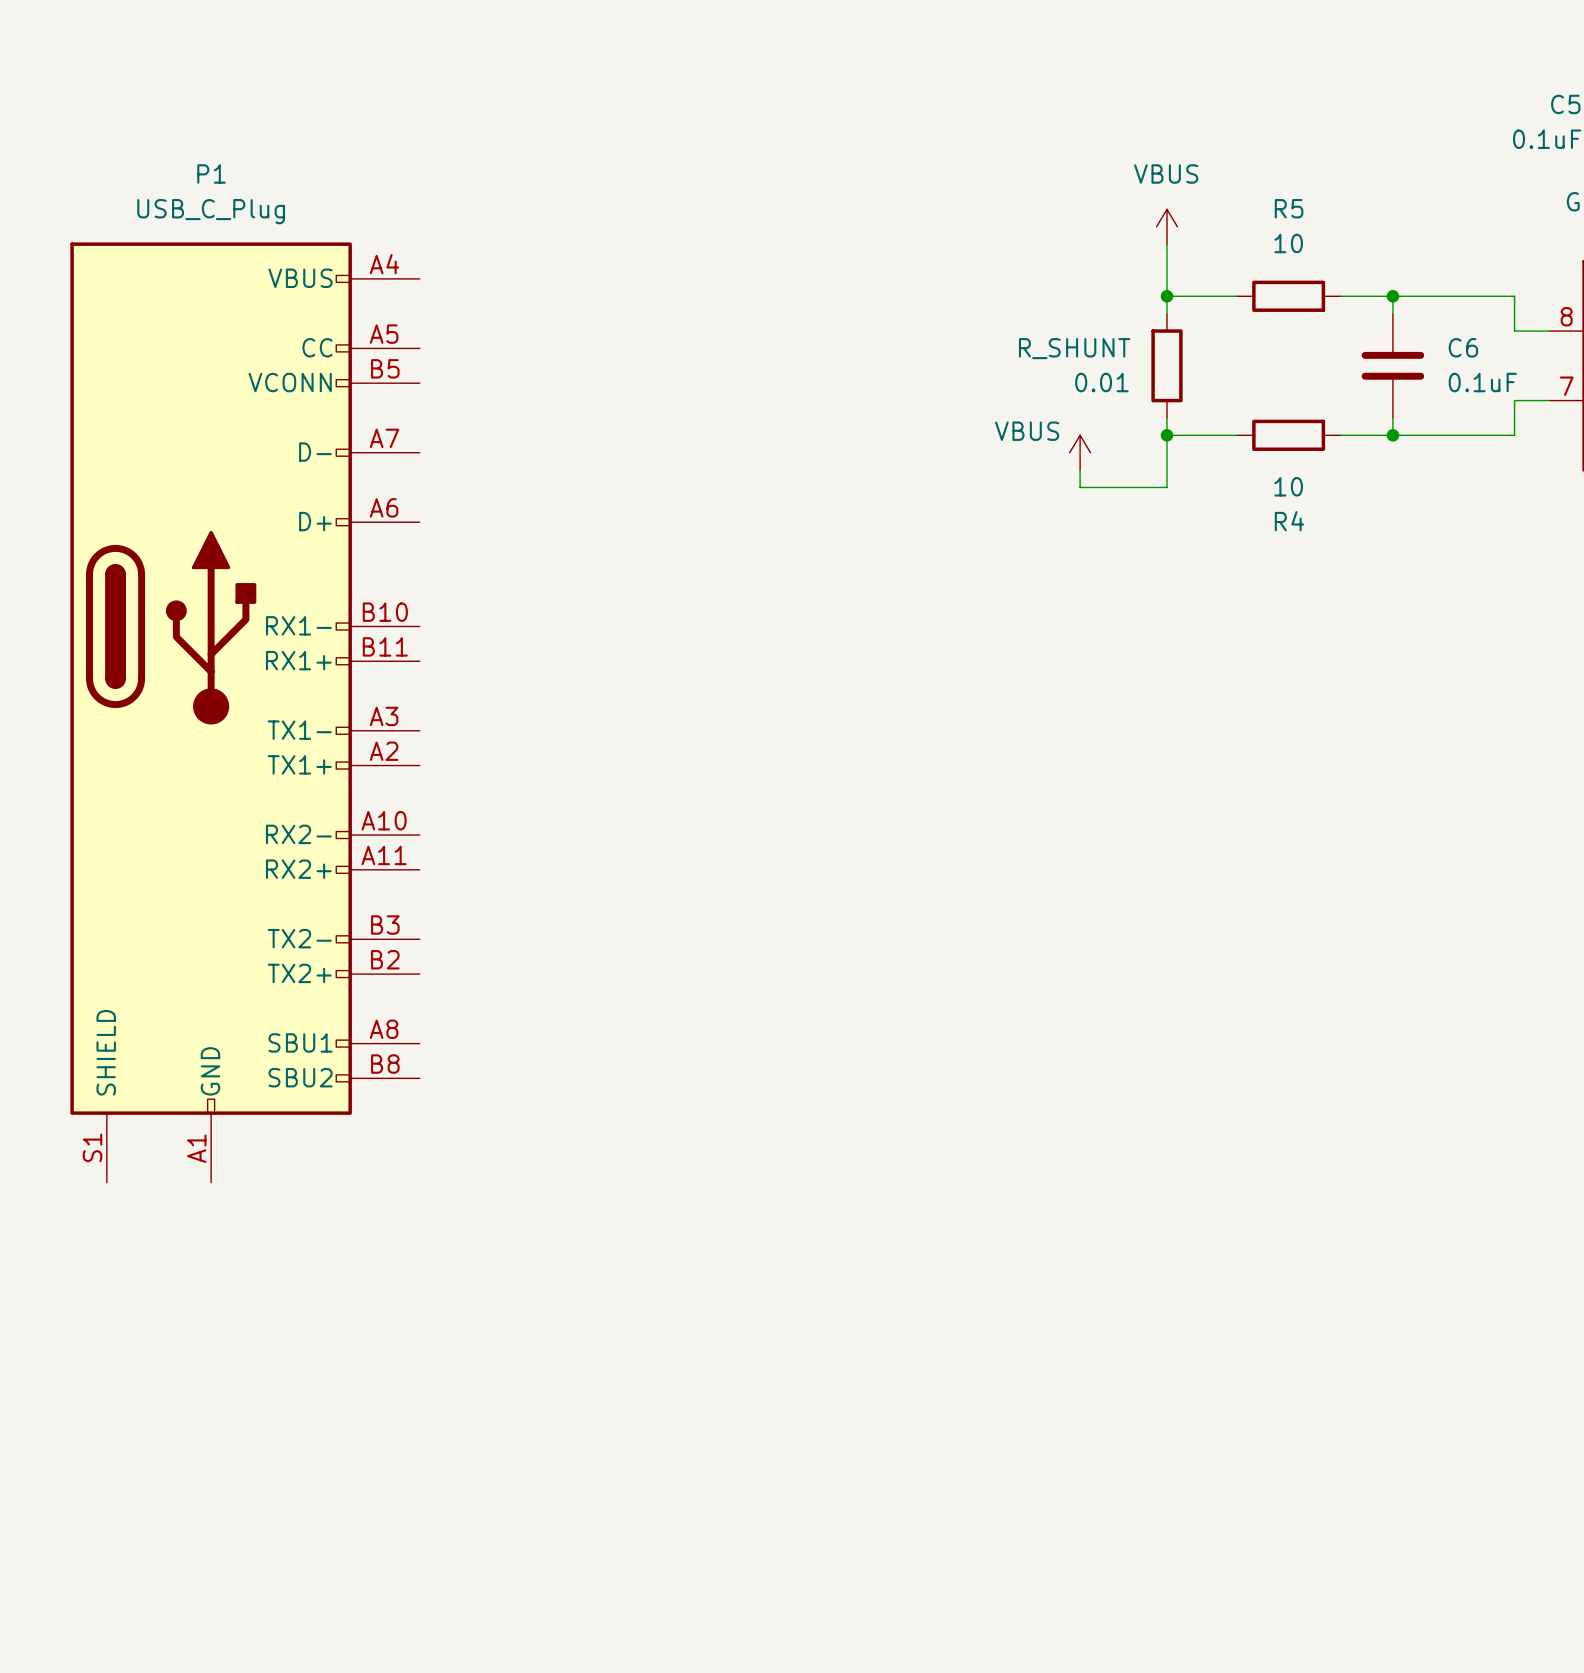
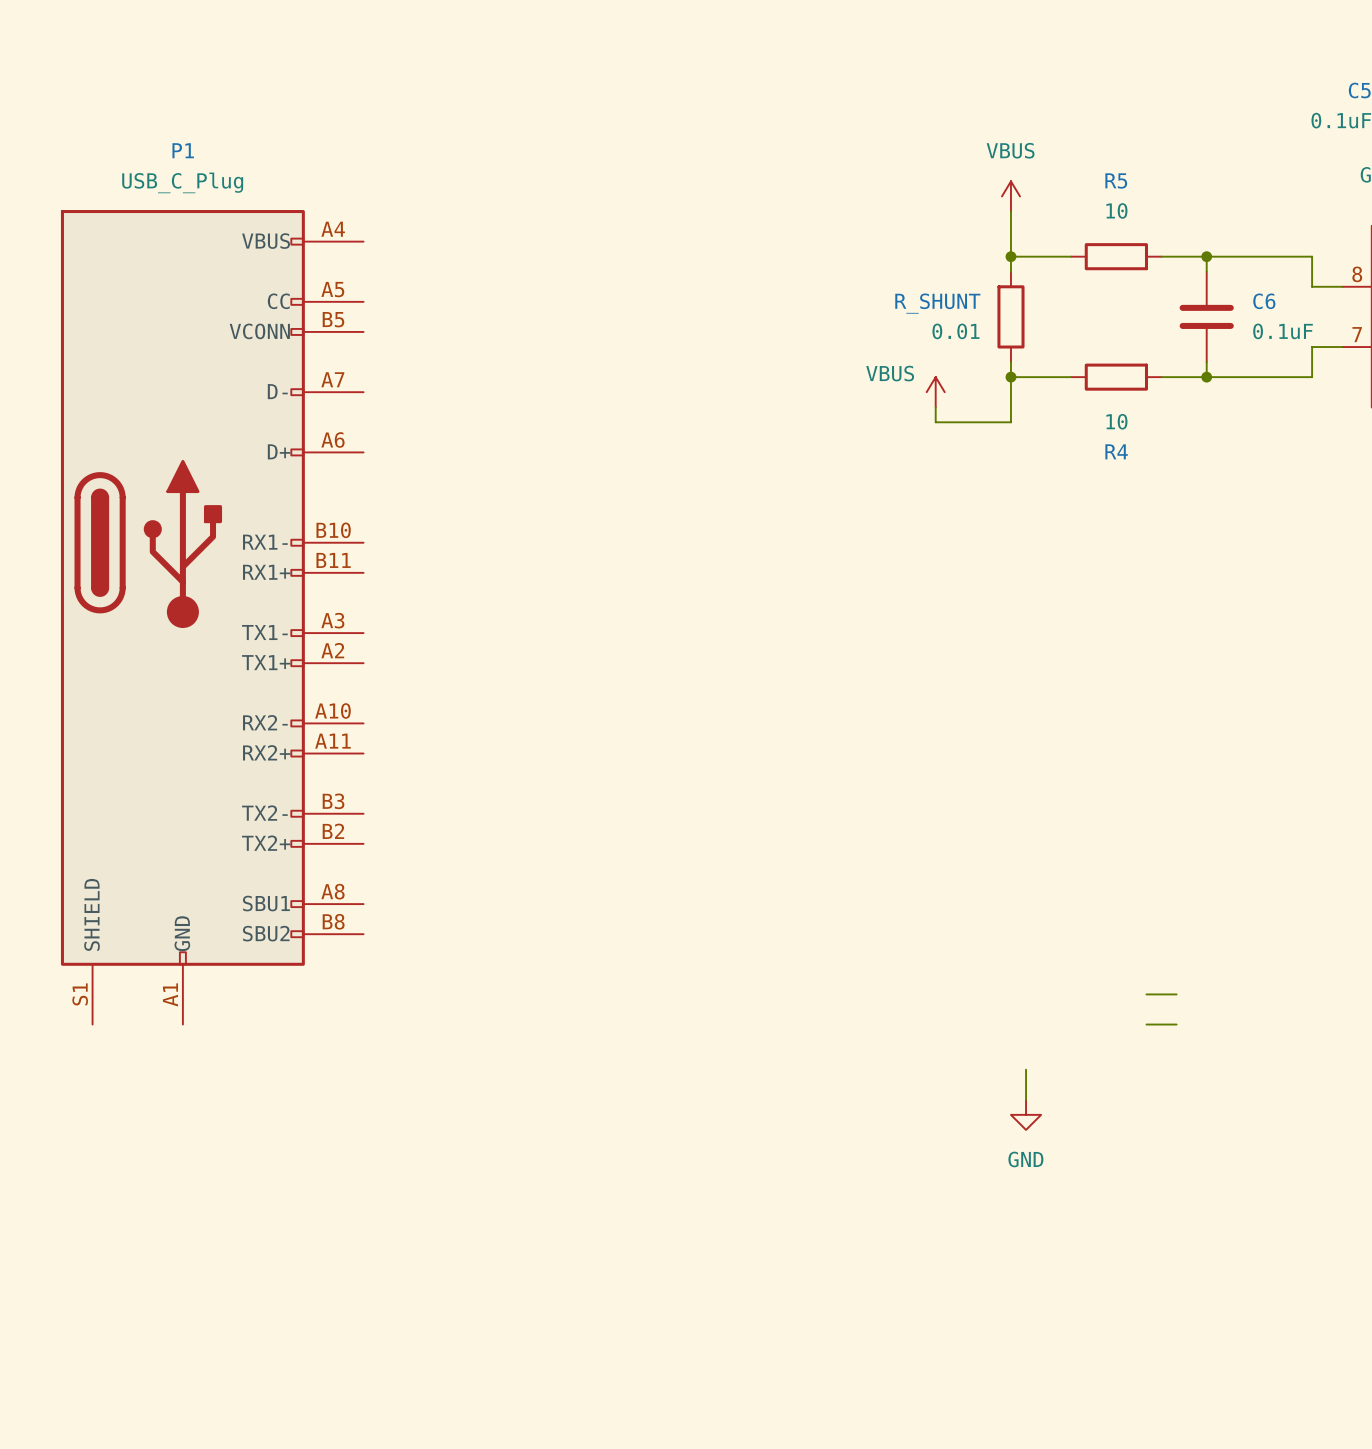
wire: none -> (1146, 994) (1176, 994)
wire: none -> (1146, 1024) (1176, 1024)
wire: none -> (1026, 1069) (1026, 1099)
power symbol: none -> GND (1026, 1114)

